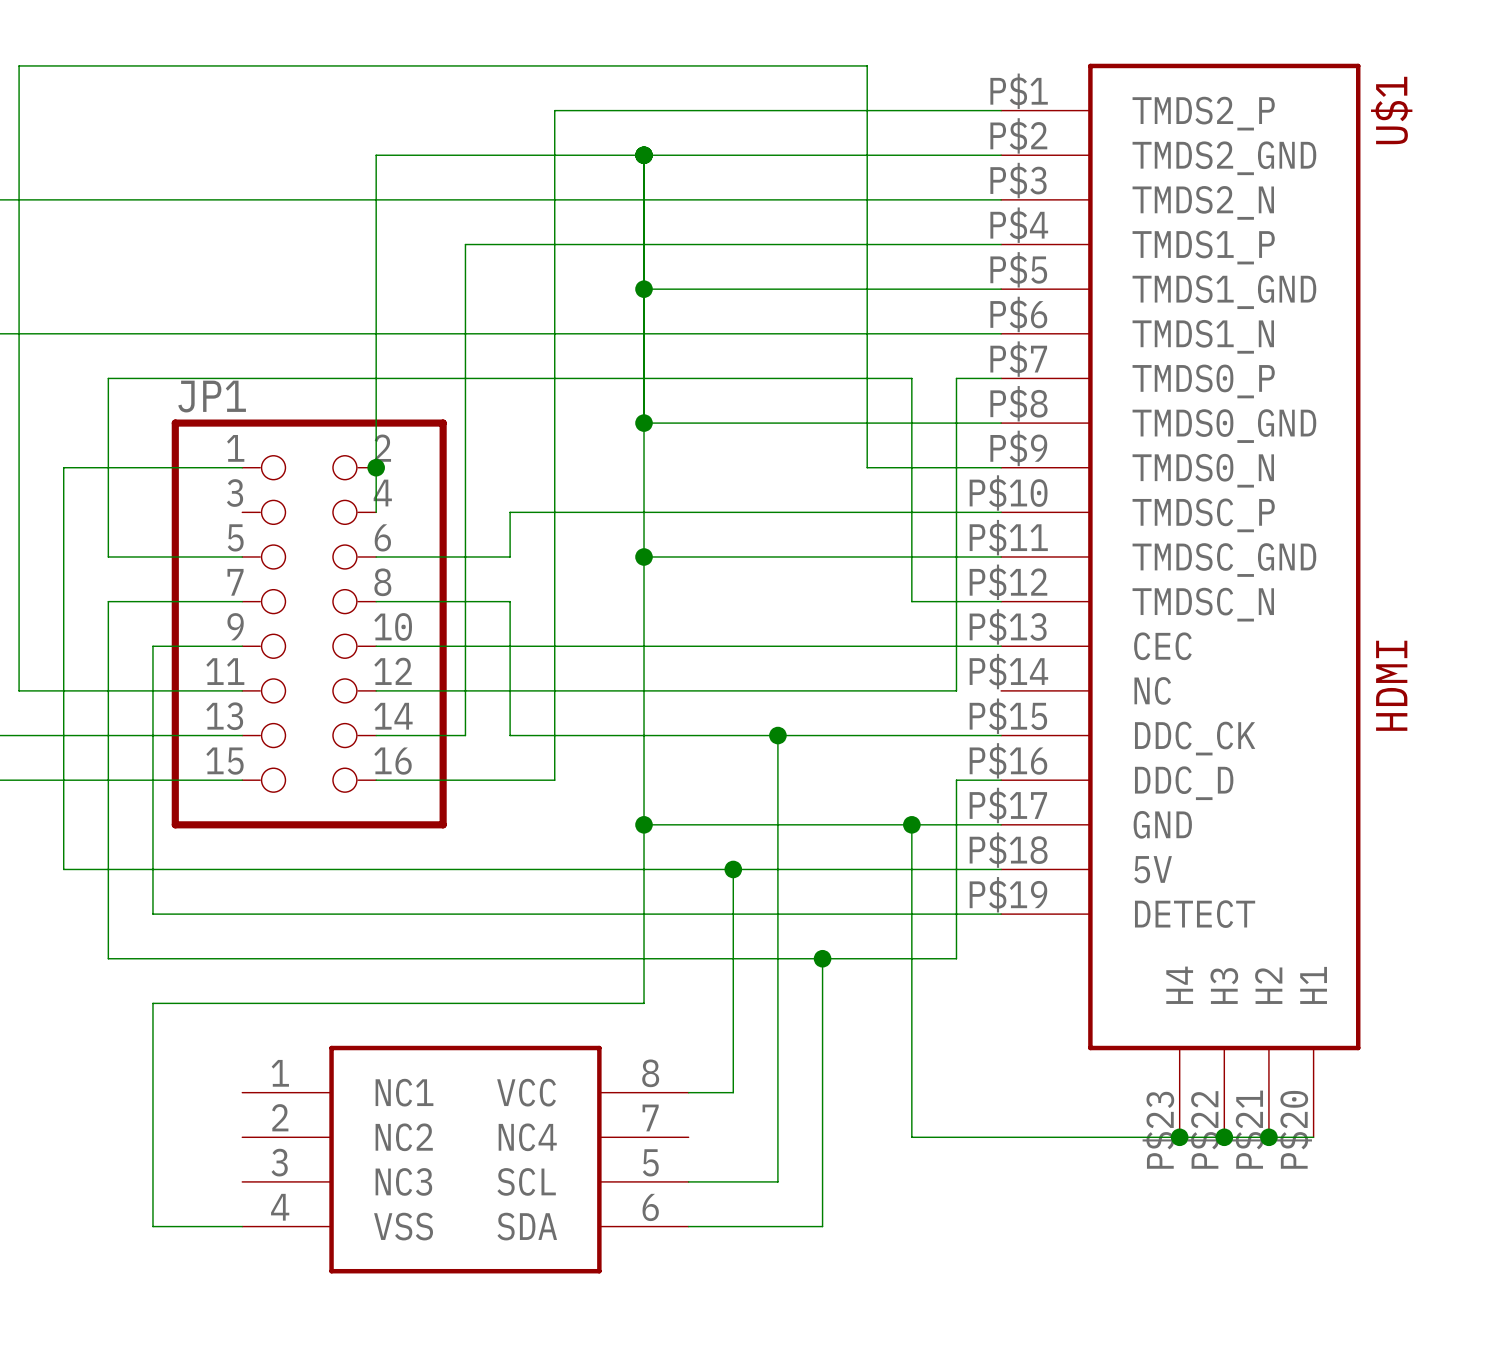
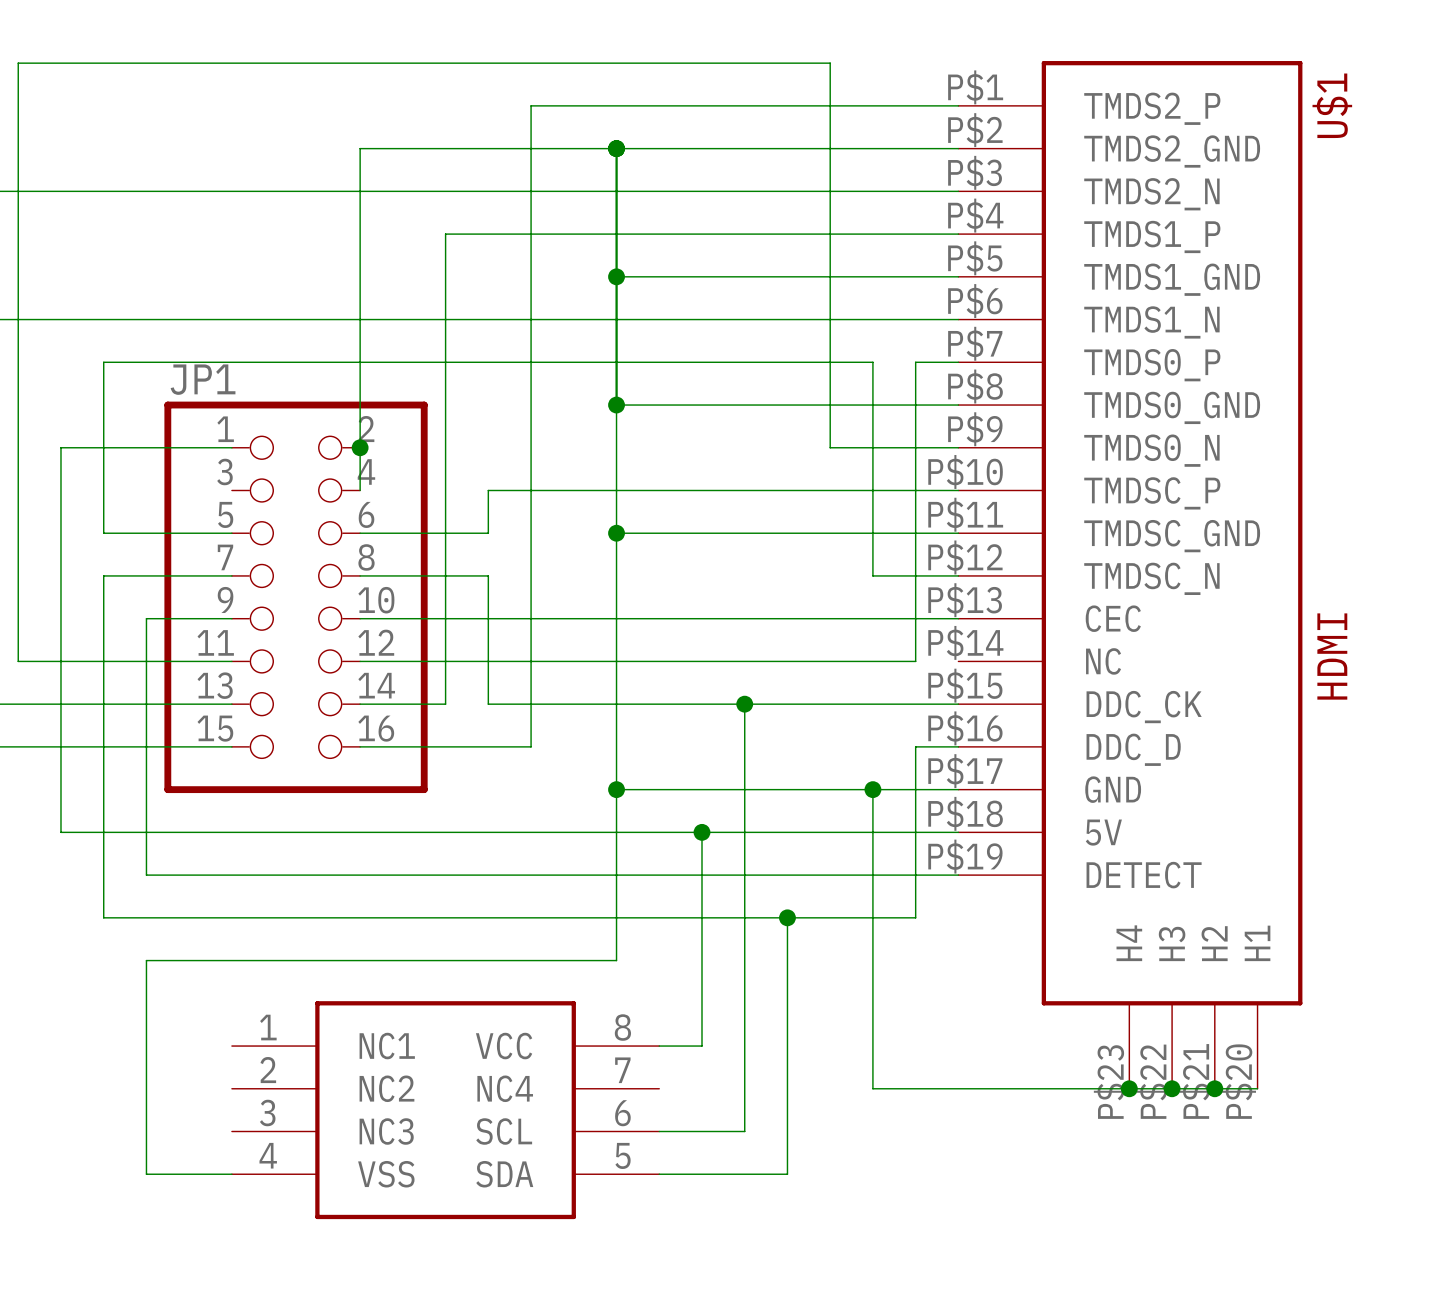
part pin number: 5 (650, 1162) -> 6 (622, 1113)
part pin number: 6 (650, 1207) -> 5 (623, 1155)

